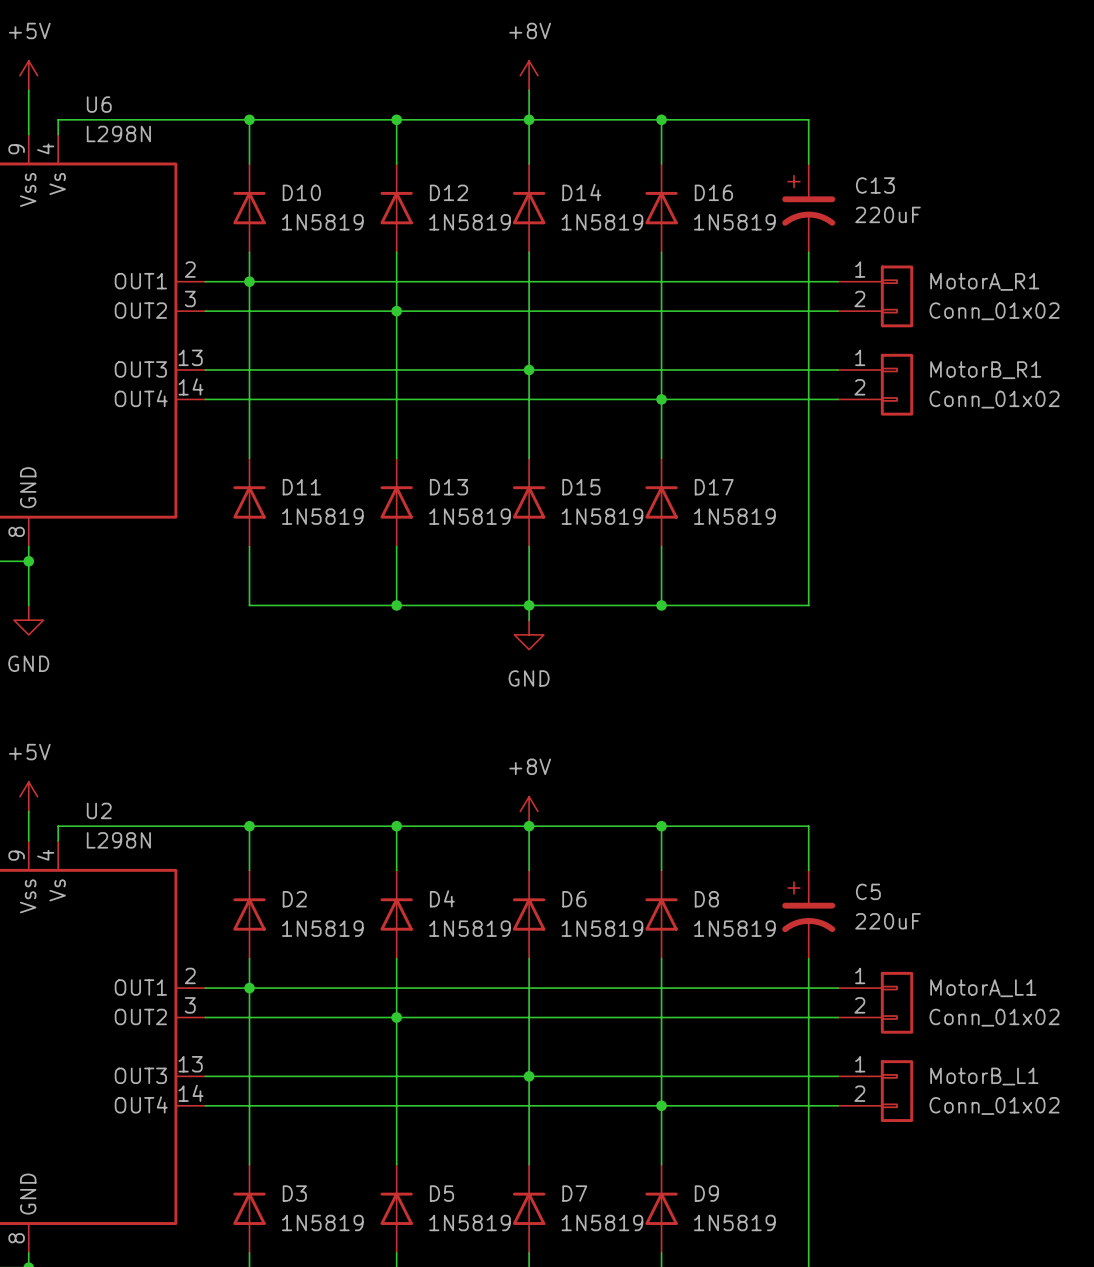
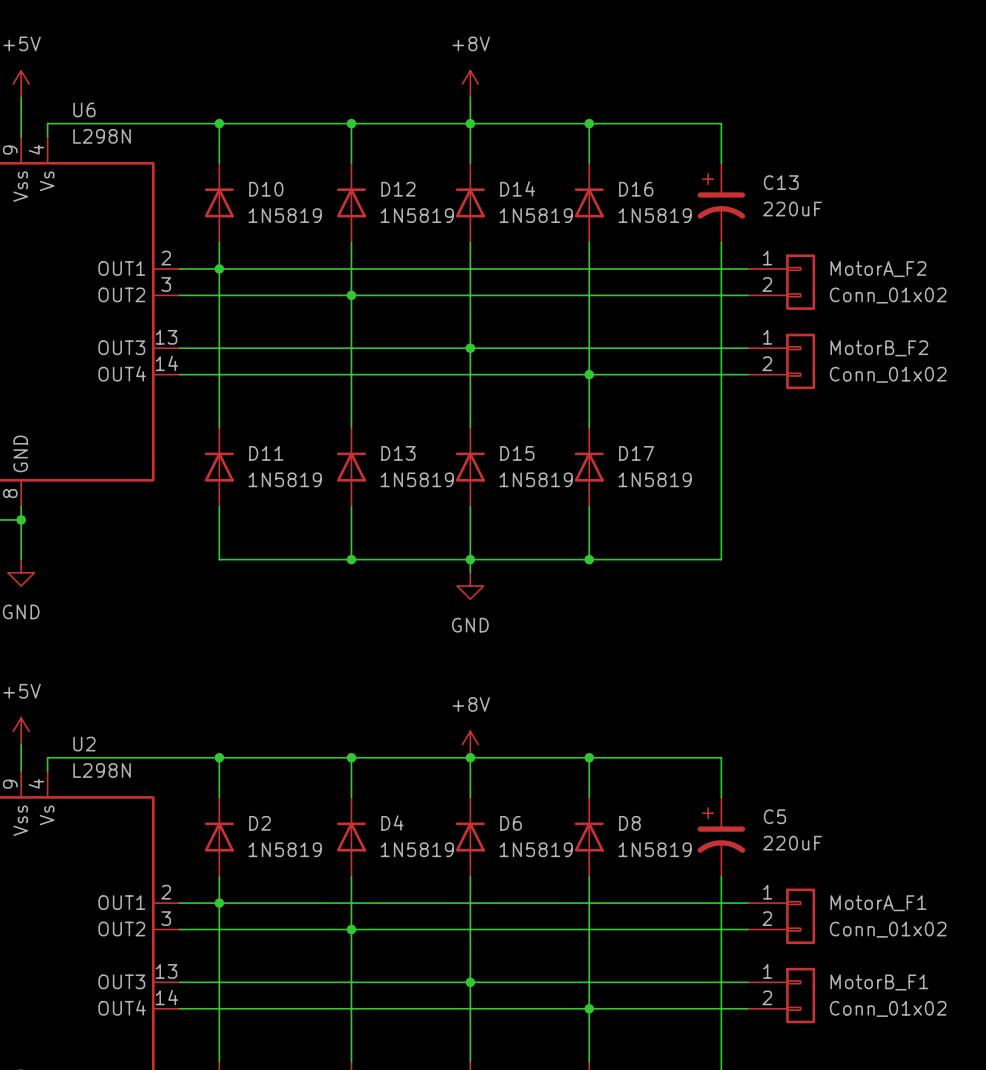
MotorA_R1 name: MotorA_R1 (984, 281) -> MotorA_F2 (878, 269)
MotorB_R1 name: MotorB_R1 (985, 370) -> MotorB_F2 (879, 348)
MotorA_L1 name: MotorA_L1 (983, 988) -> MotorA_F1 (878, 903)
MotorB_L1 name: MotorB_L1 (984, 1076) -> MotorB_F1 (879, 982)

